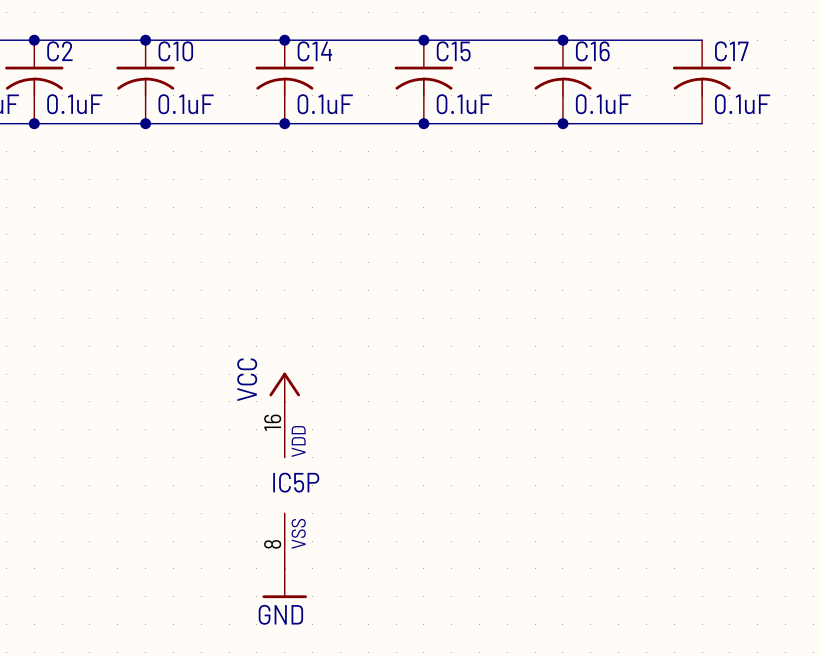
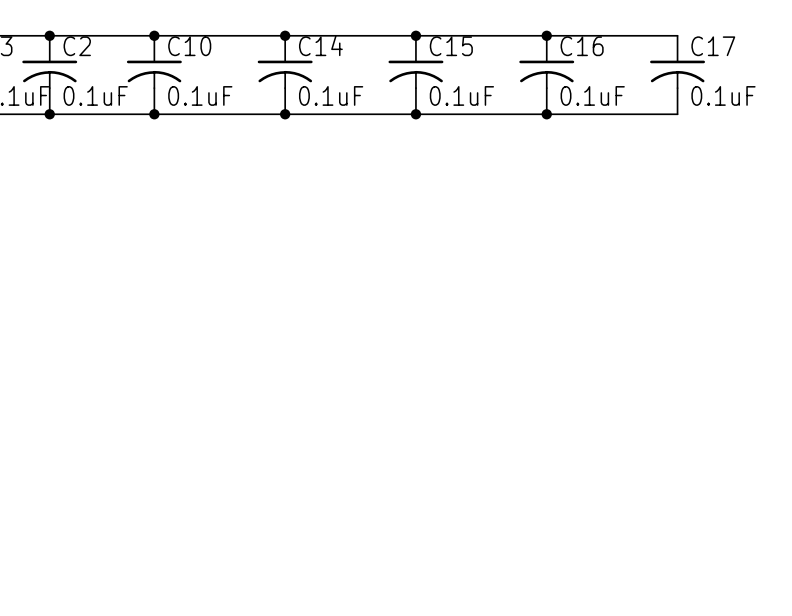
power symbol: VCC (284, 387) -> none
IC5P: (284, 485) -> none
power symbol: GND (284, 583) -> none

